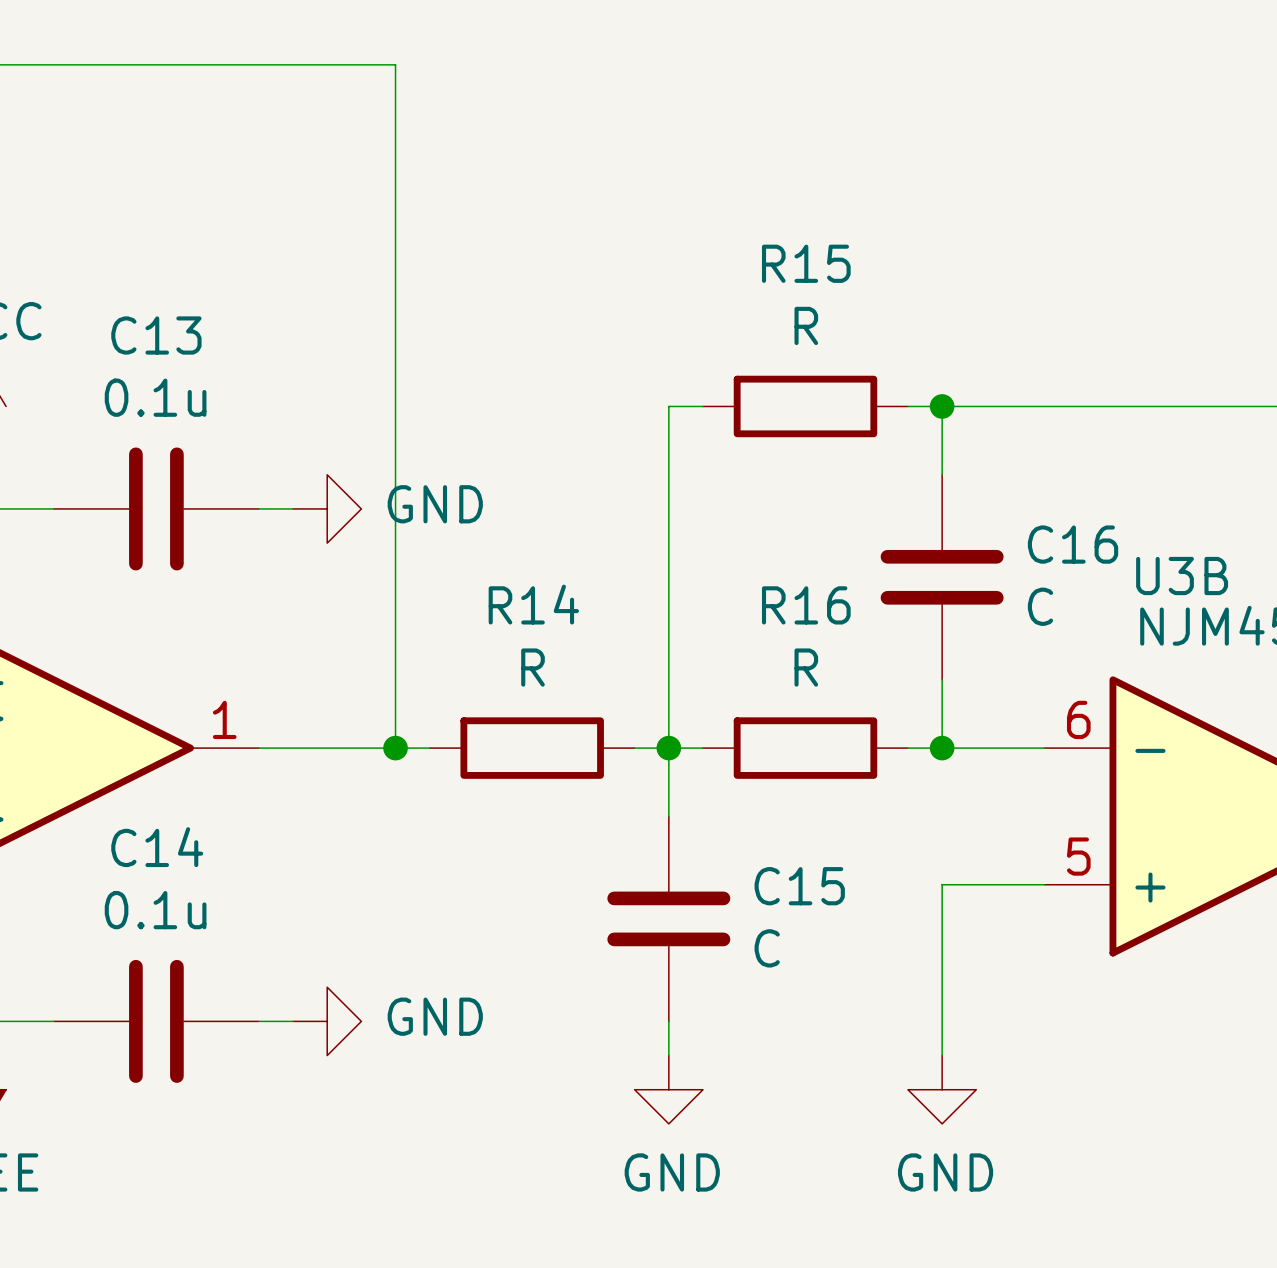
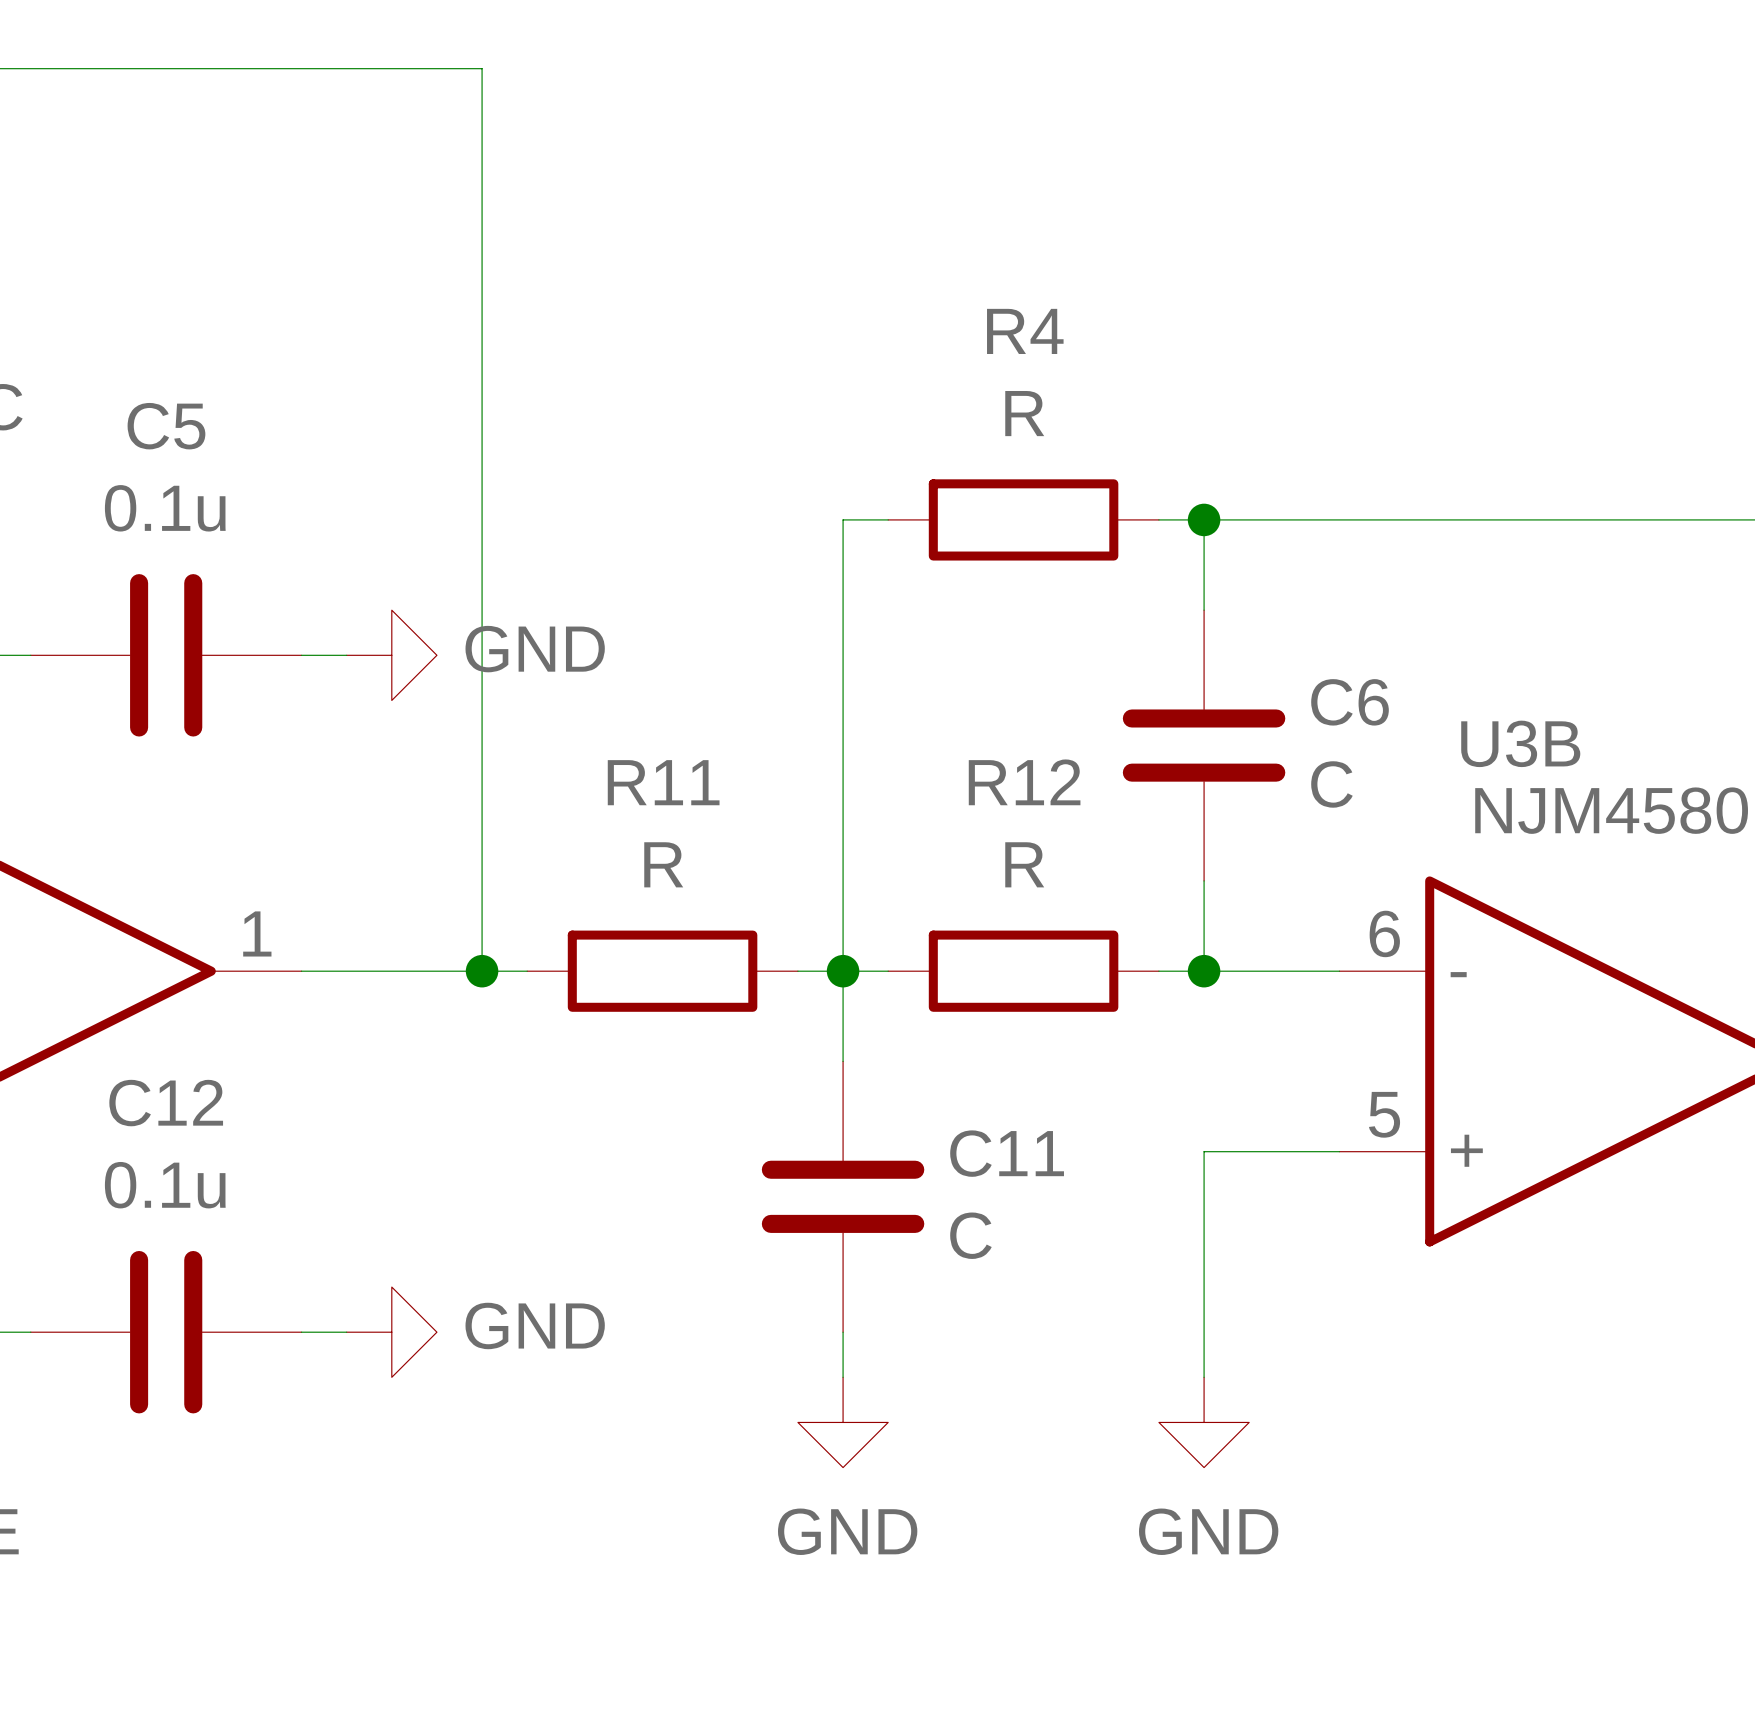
R15 name: R15 (806, 263) -> R4 (1025, 331)
C13 name: C13 (156, 335) -> C5 (166, 426)
C16 name: C16 (1073, 544) -> C6 (1350, 702)
R14 name: R14 (533, 604) -> R11 (663, 782)
R16 name: R16 (806, 605) -> R12 (1024, 782)
C14 name: C14 (157, 847) -> C12 (166, 1103)
C15 name: C15 (799, 886) -> C11 (1007, 1153)

